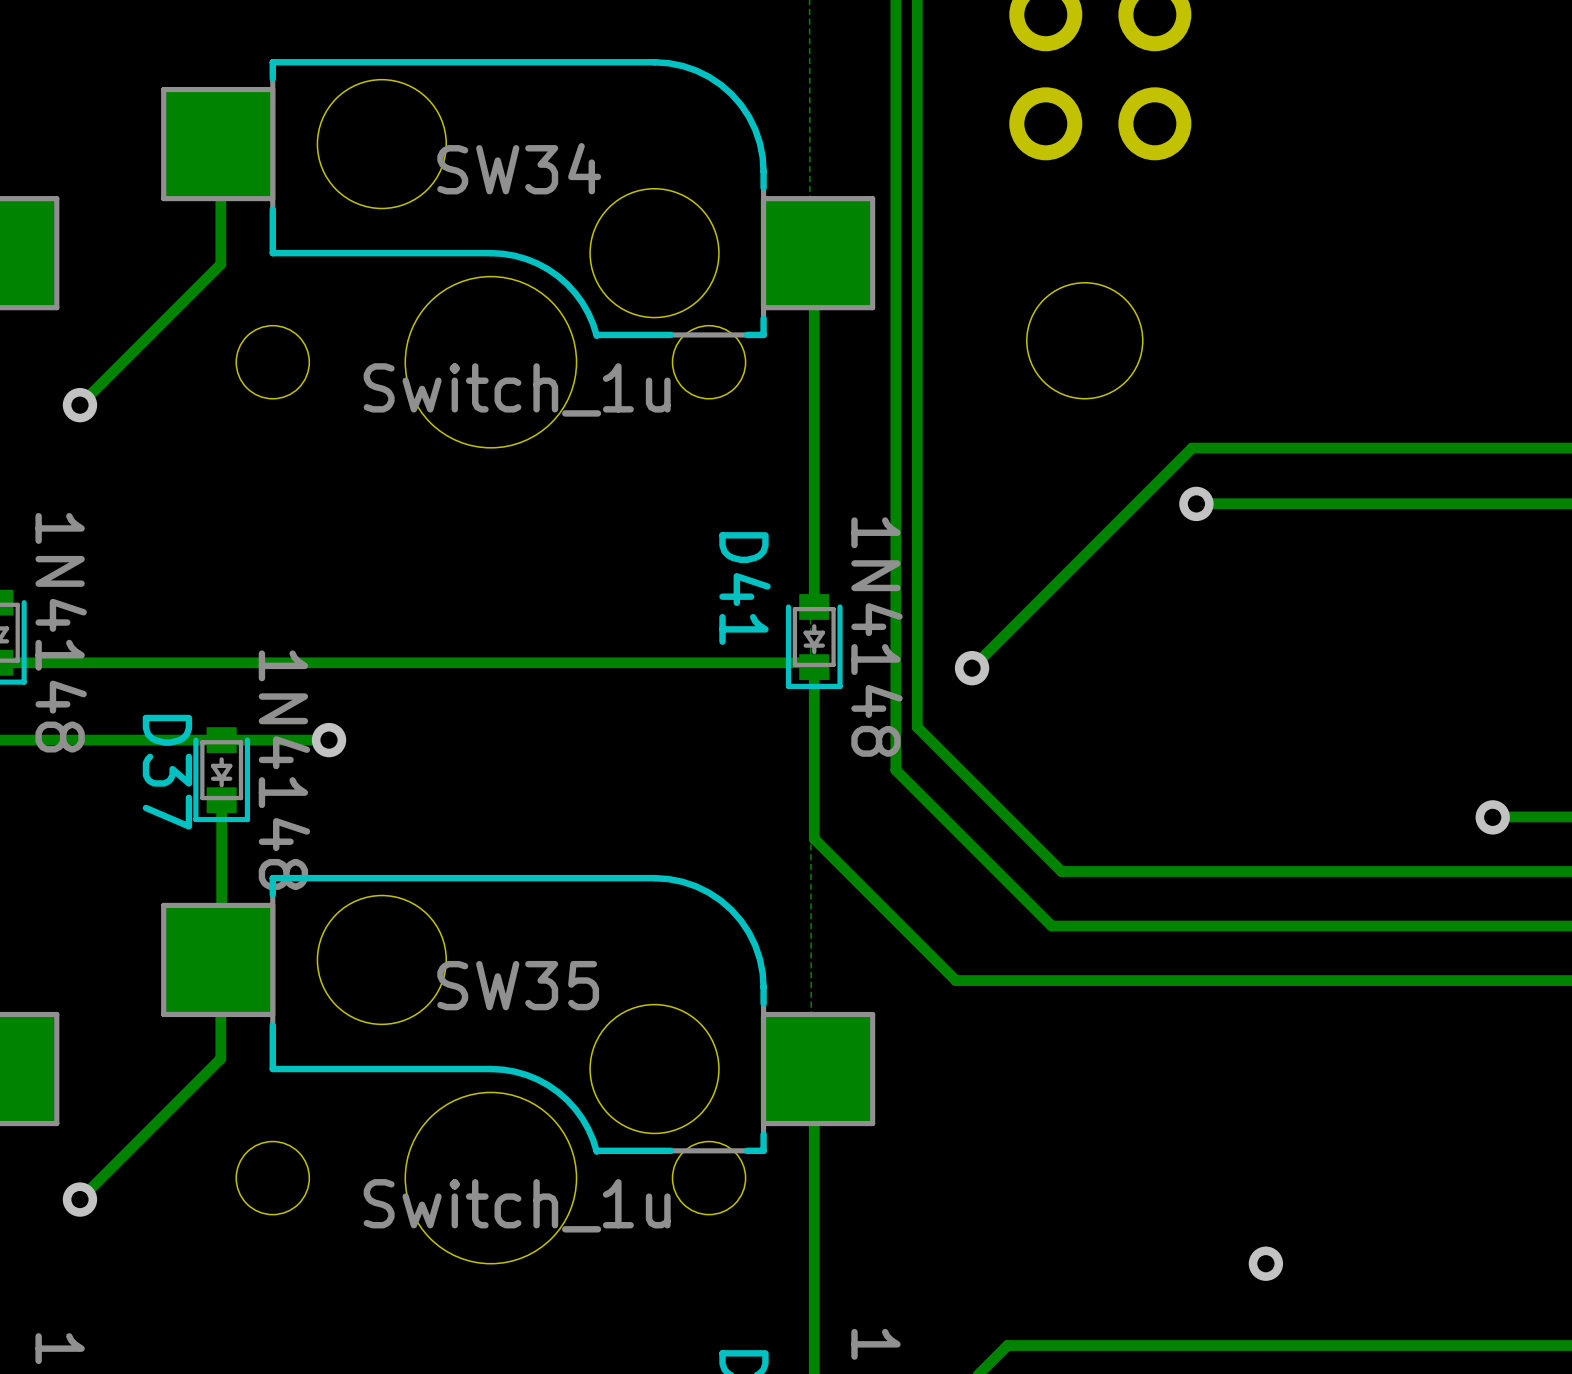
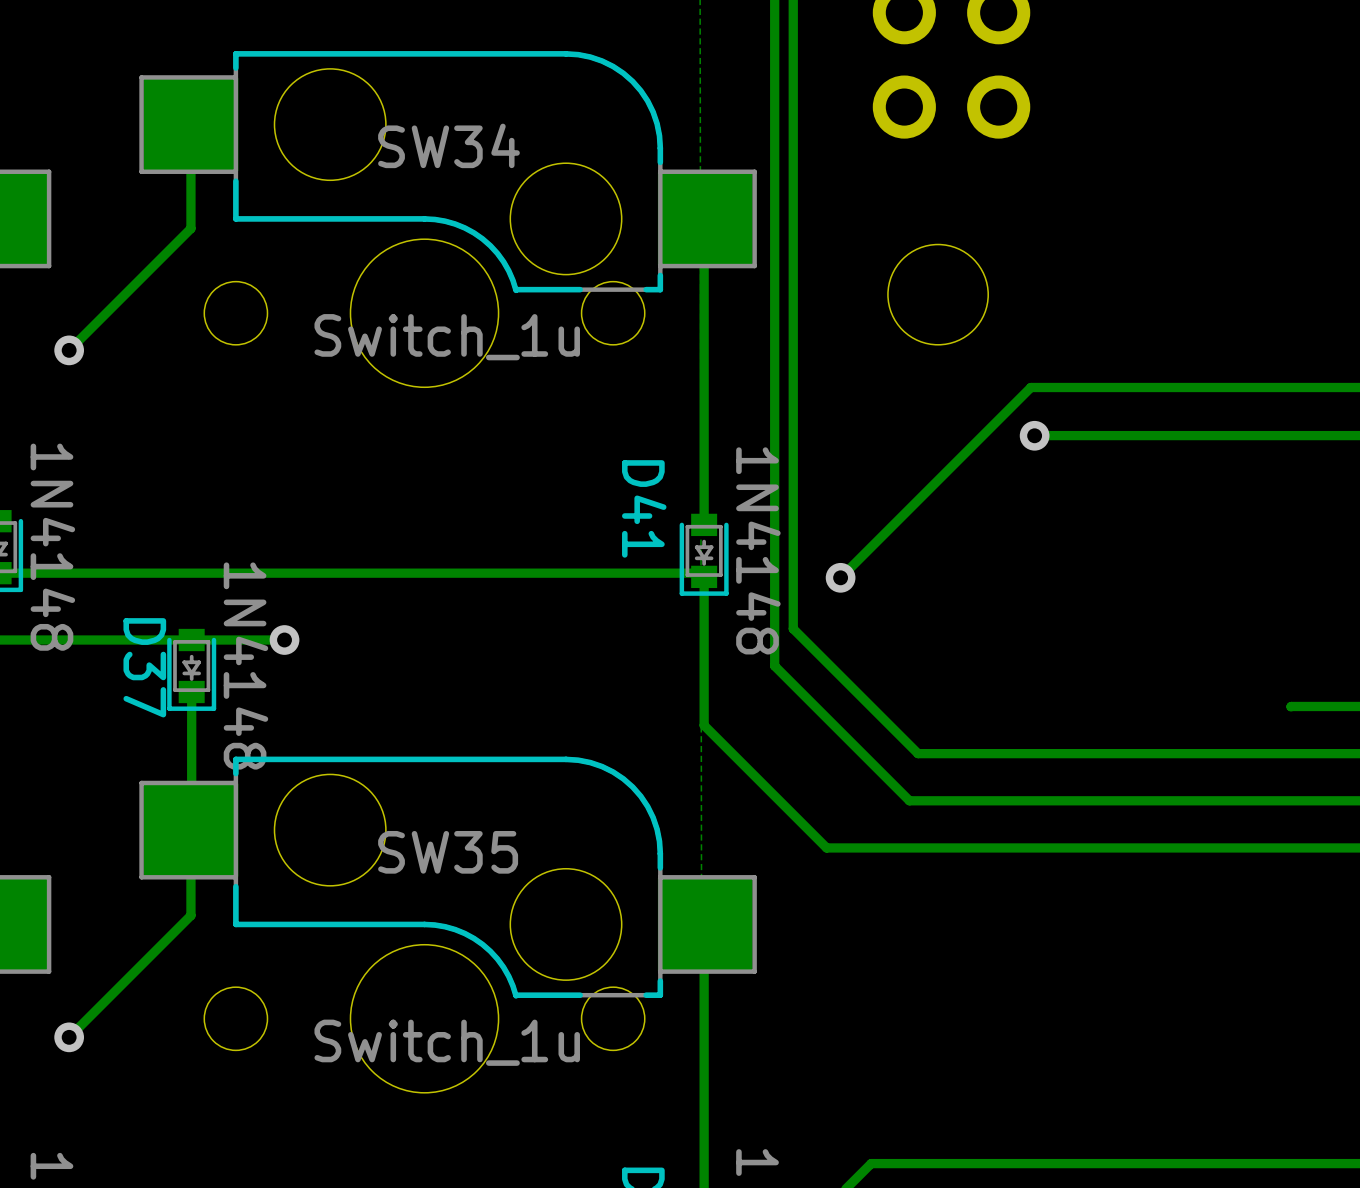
via: (1492, 817) -> none
via: (1265, 1263) -> none

